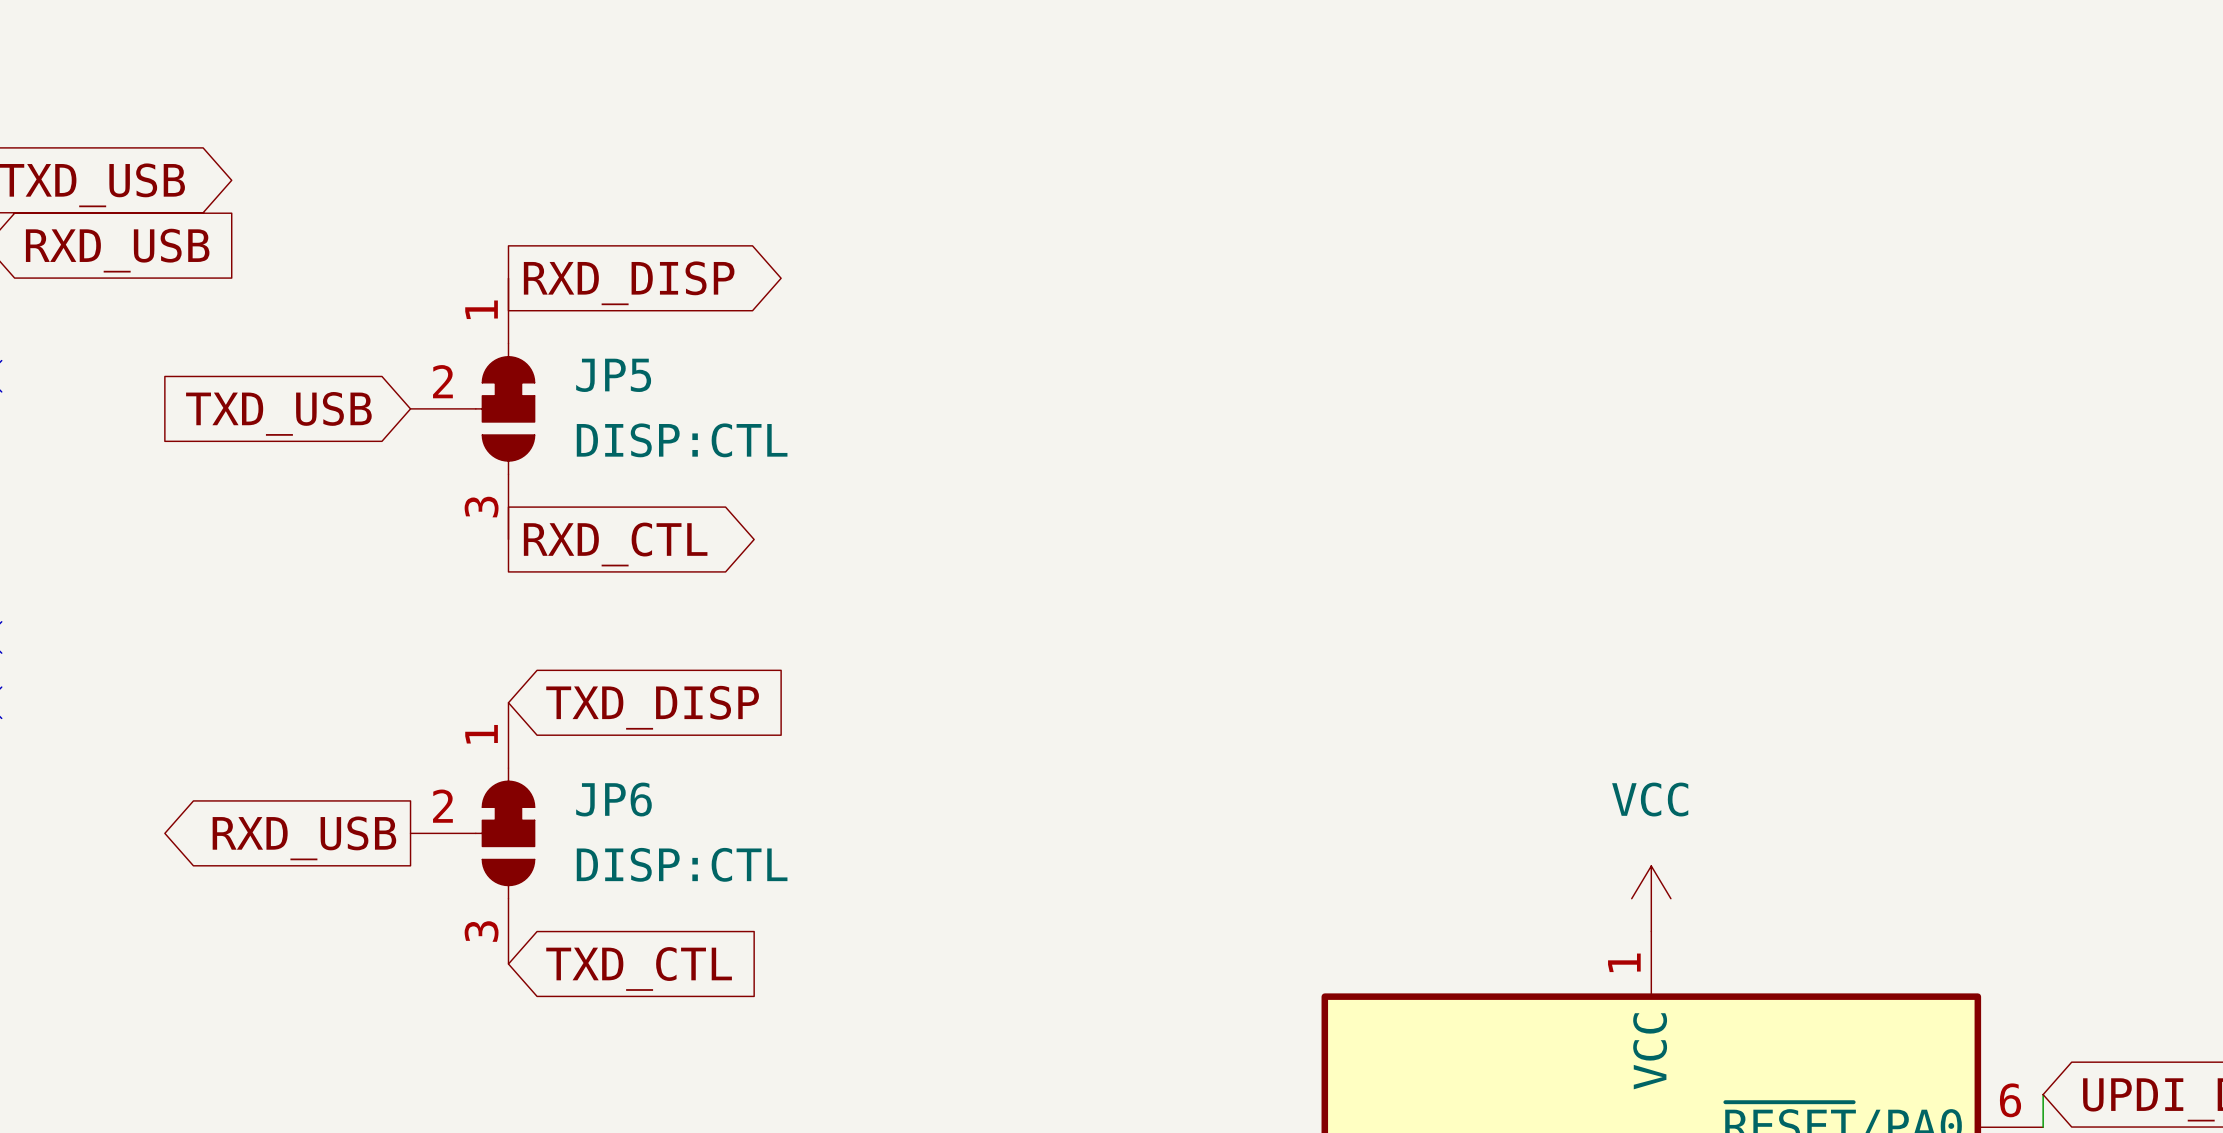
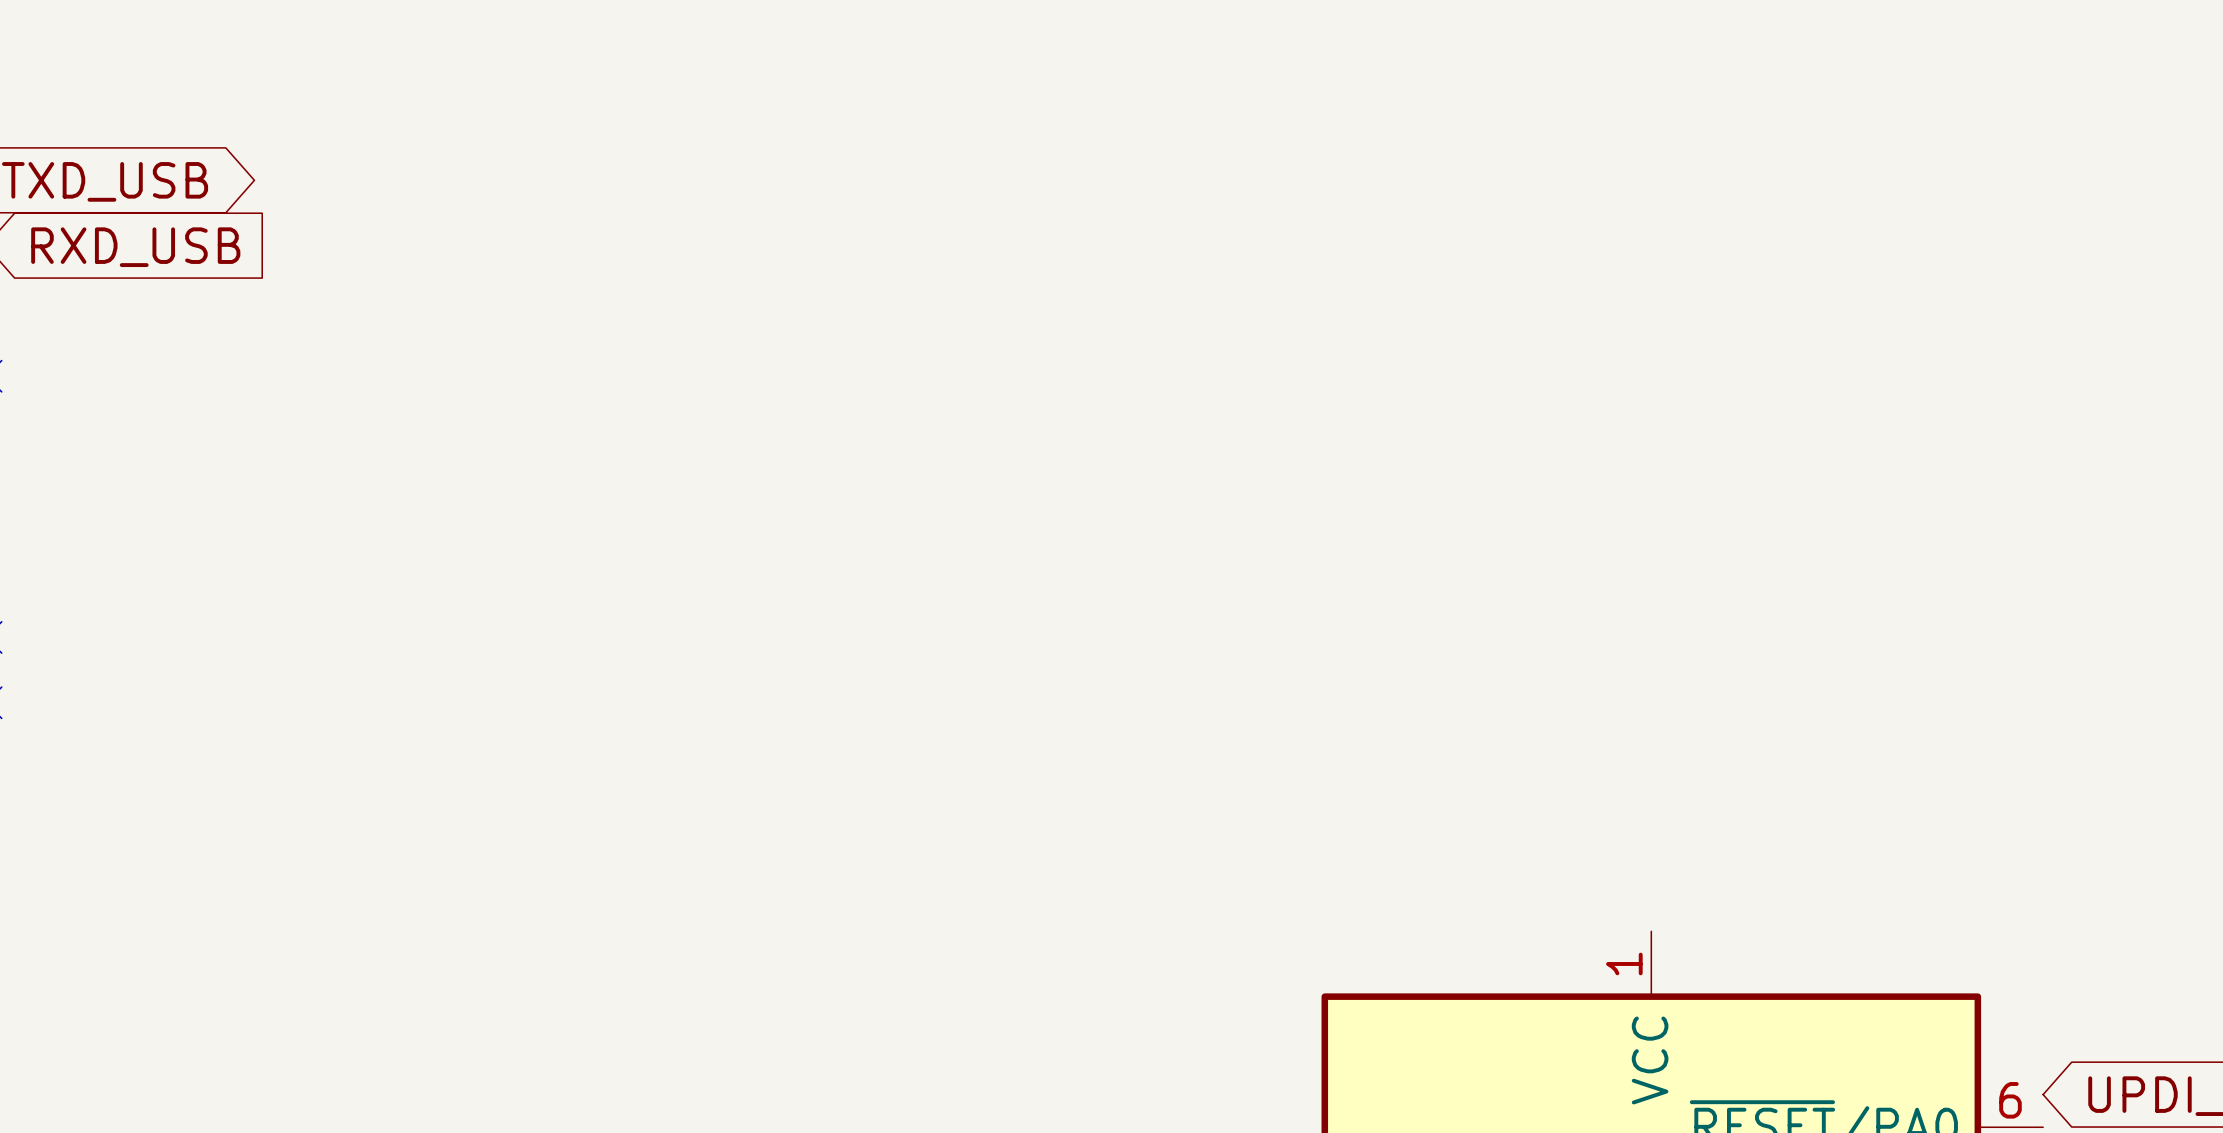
global label: RXD_DISP (629, 283) -> none
JP5: DISP:CTL (472, 408) -> none
global label: TXD_USB (278, 413) -> none
global label: RXD_CTL (615, 544) -> none
global label: TXD_DISP (652, 707) -> none
JP6: DISP:CTL (472, 833) -> none
global label: RXD_USB (304, 838) -> none
power symbol: VCC (1651, 898) -> none
global label: TXD_CTL (639, 968) -> none
wire: (2043, 1094) (2043, 1127) -> none

